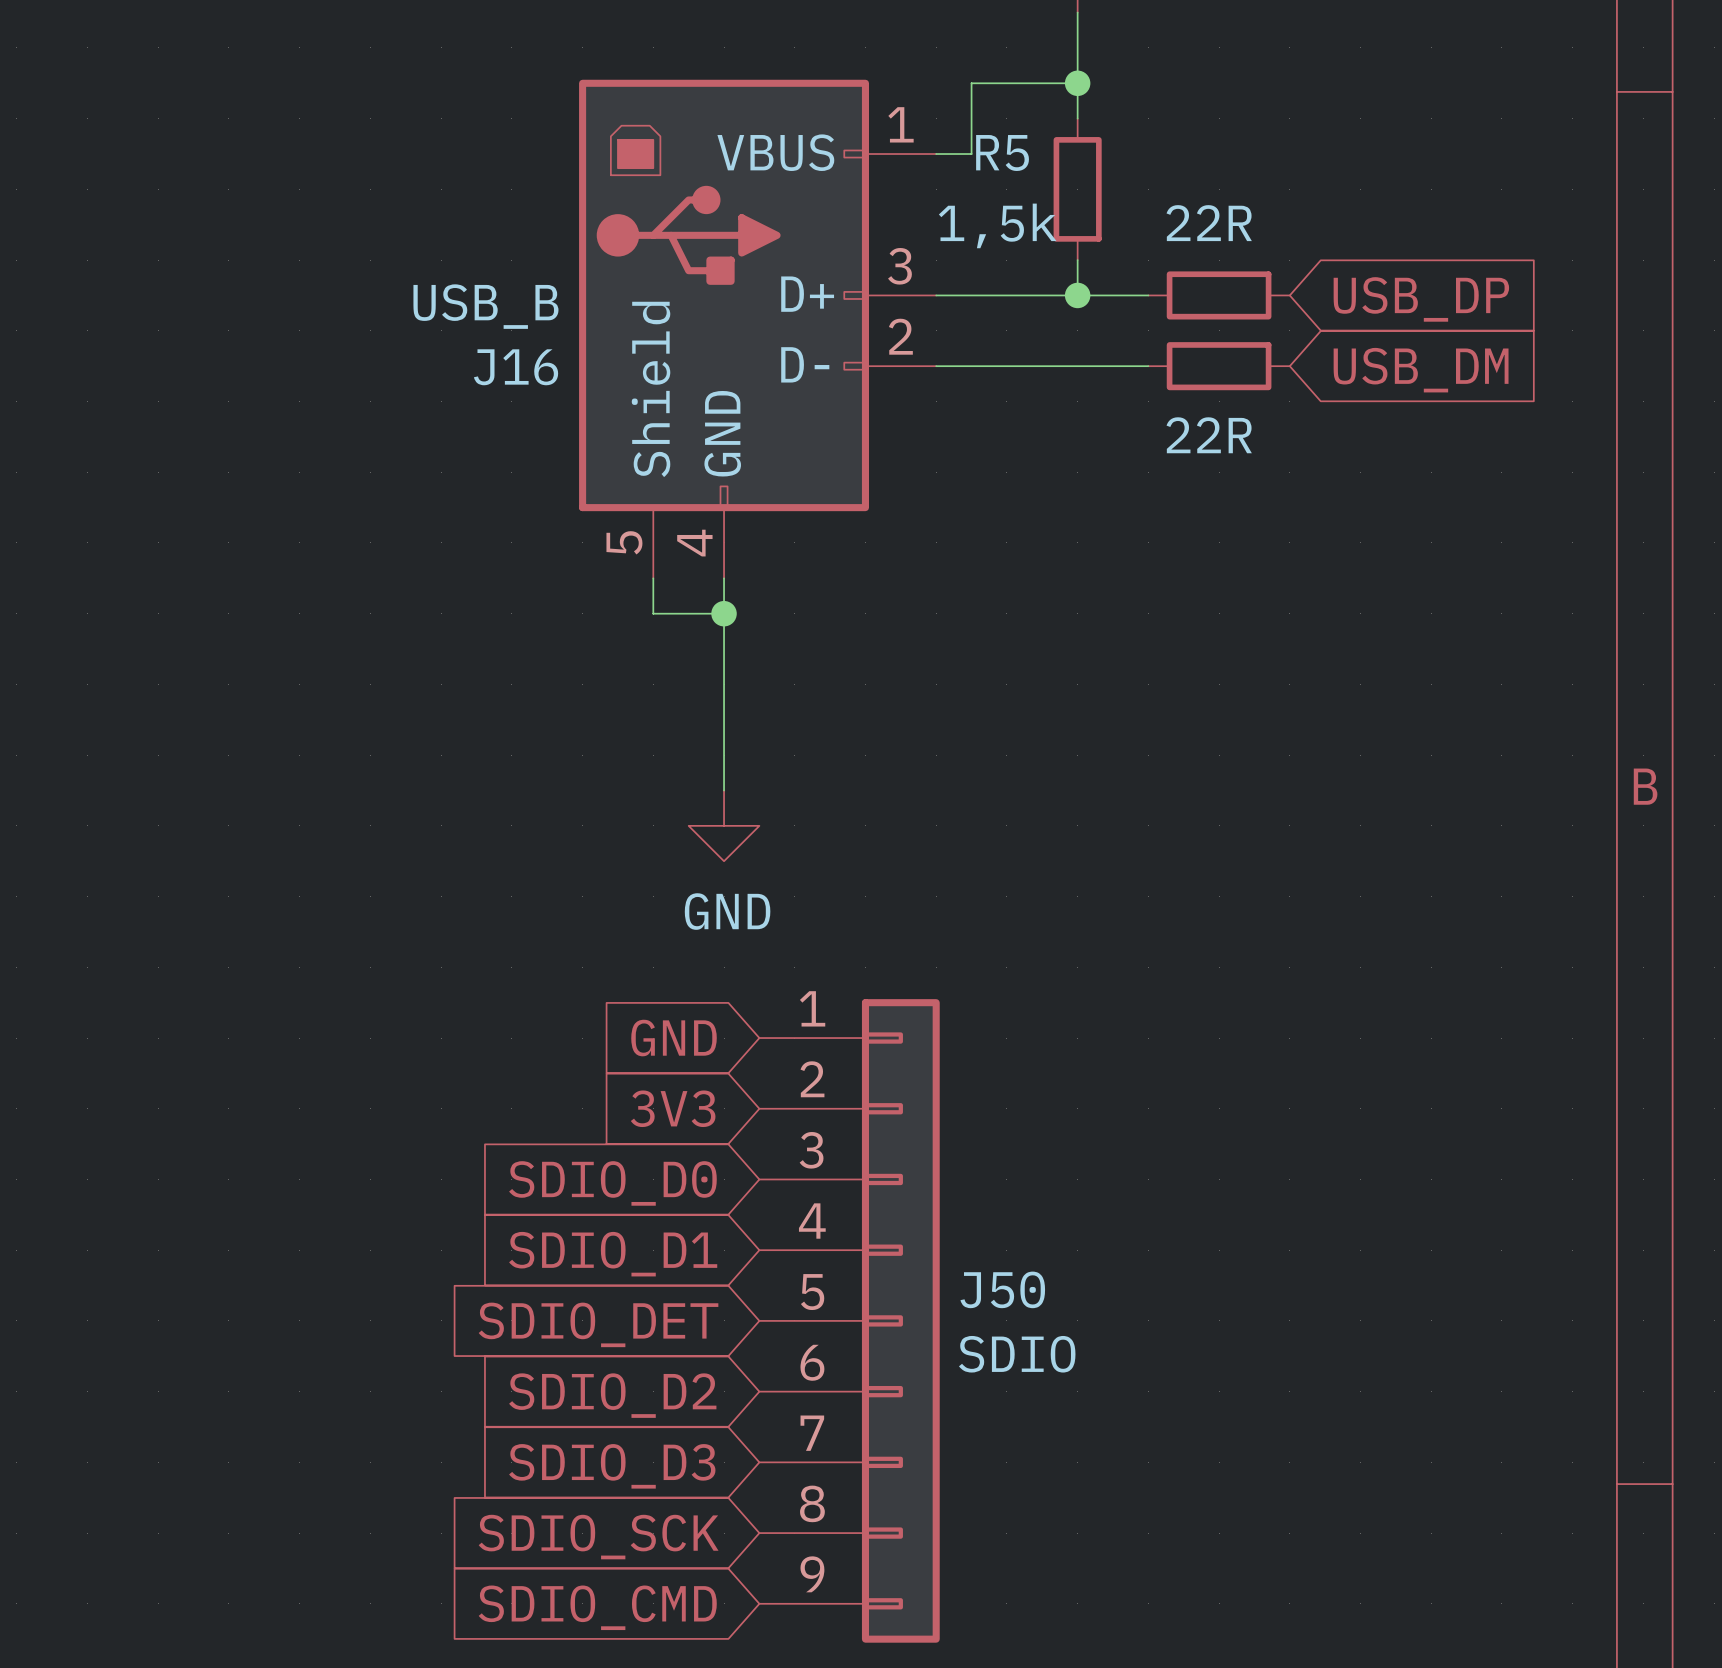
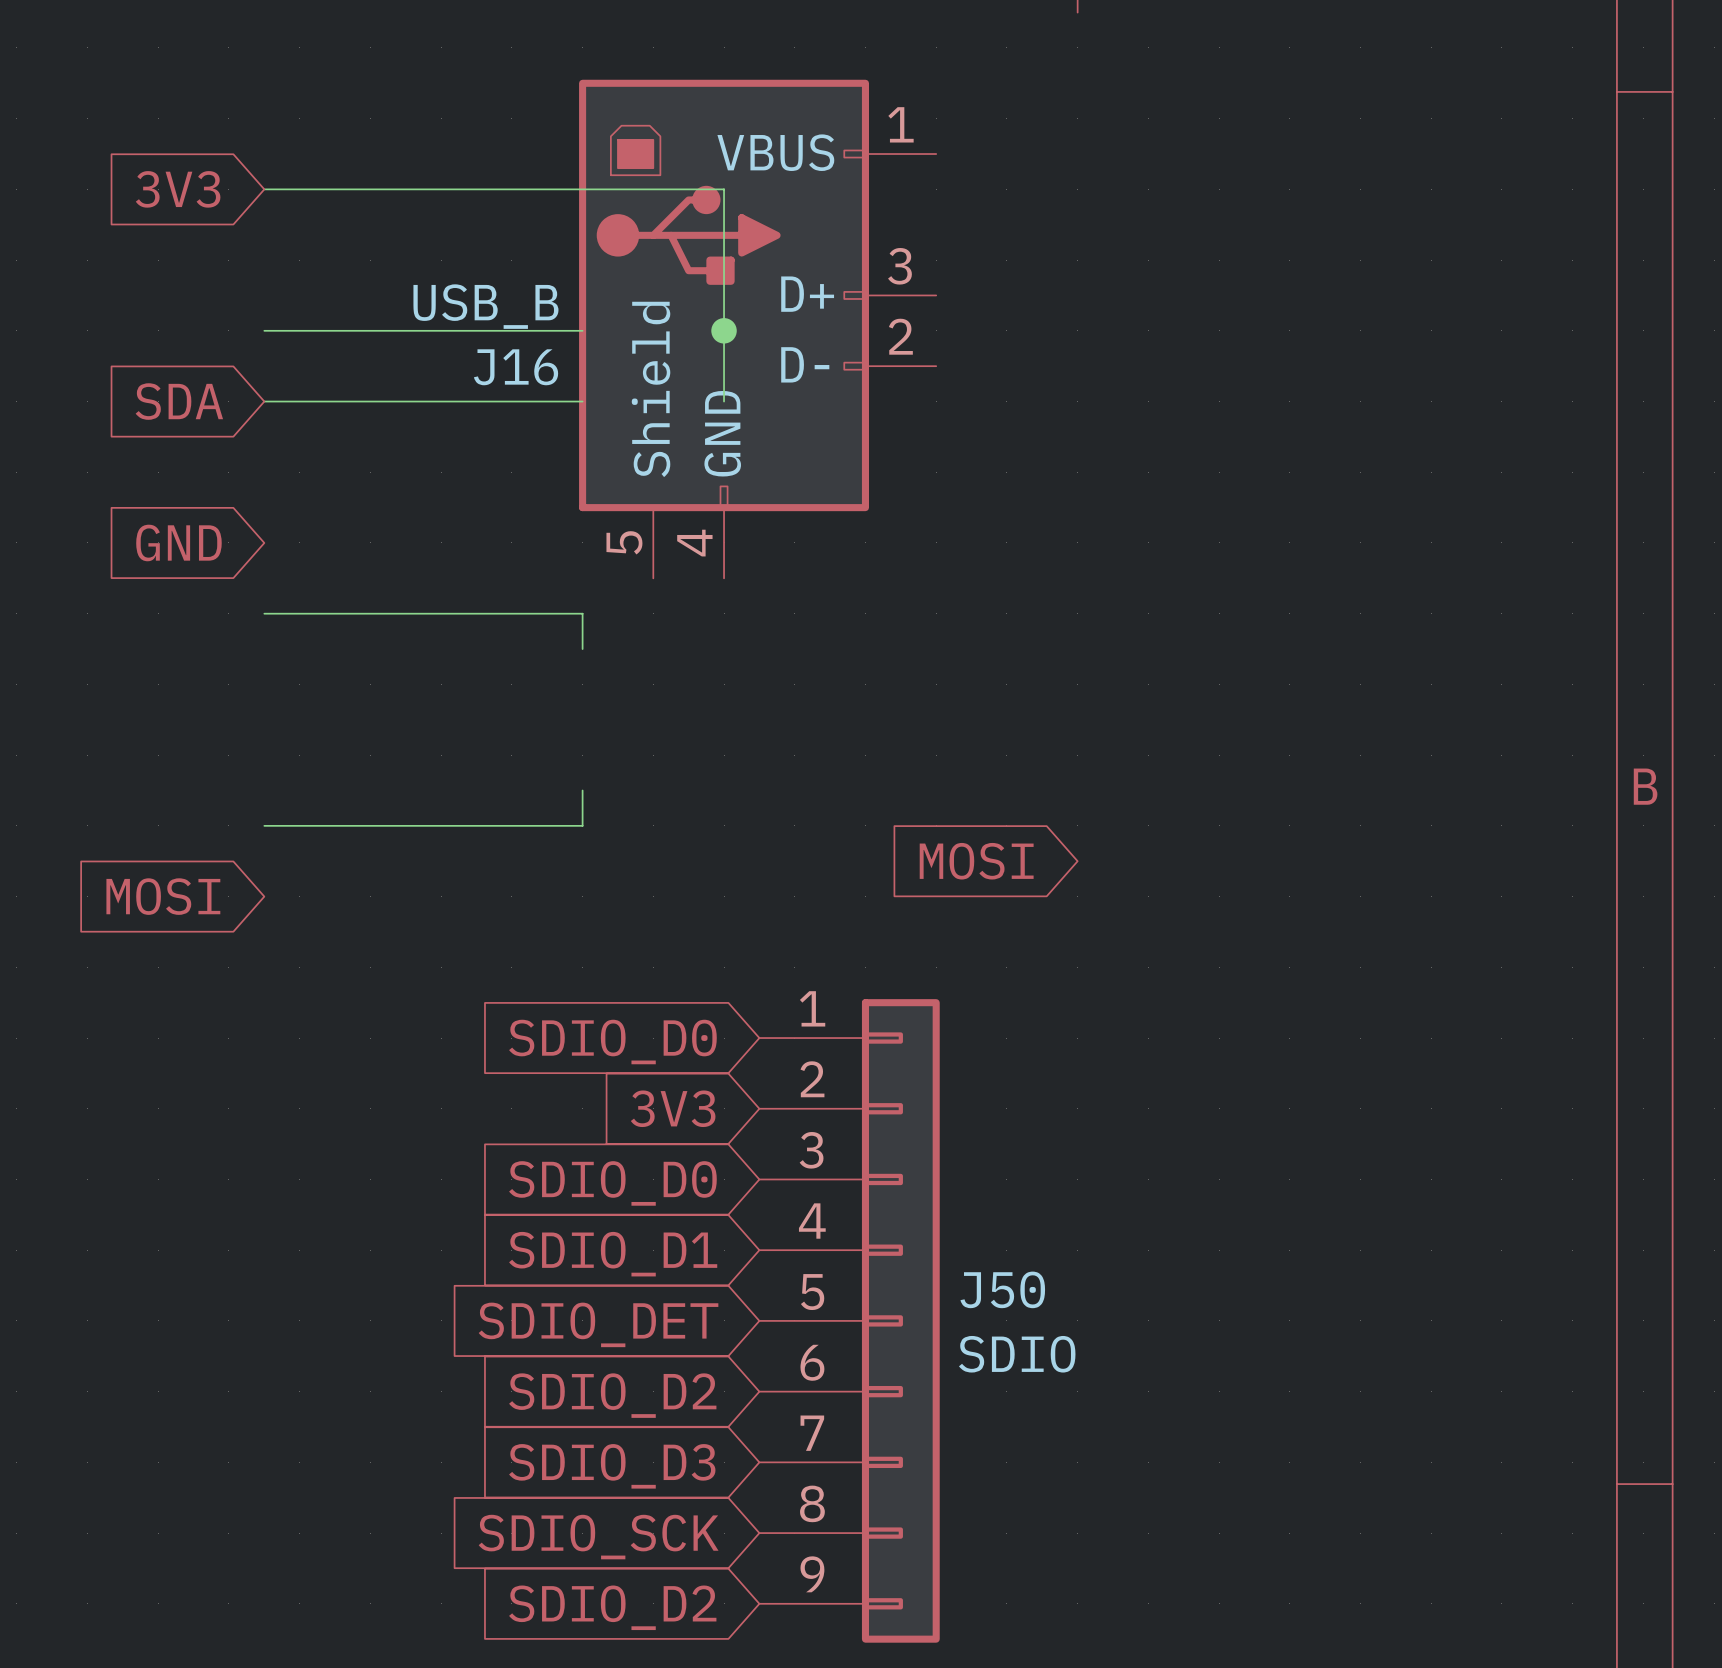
wire: (1077, 12) (1077, 118) -> none
wire: (1077, 83) (971, 83) (971, 154) (936, 154) -> none
junction: (1077, 83) -> none
global label: none -> 3V3 (178, 189)
wire: none -> (264, 189) (724, 189) (724, 401)
R5: 1,5k (1077, 189) -> none
wire: (1077, 260) (1077, 295) -> none
wire: (936, 295) (1148, 295) -> none
junction: (1077, 295) -> none
part: 22R (1219, 295) -> none
global label: USB_DP (1421, 299) -> none
wire: none -> (264, 330) (582, 330)
junction: none -> (724, 330)
wire: (936, 366) (1148, 366) -> none
part: 22R (1219, 366) -> none
global label: USB_DM (1421, 370) -> none
global label: none -> SDA (179, 401)
wire: none -> (264, 401) (582, 401)
global label: none -> GND (178, 542)
wire: (653, 578) (653, 613) (724, 613) -> none
wire: (724, 578) (724, 790) -> none
wire: none -> (264, 613) (582, 613) (582, 649)
junction: (724, 613) -> none
wire: none -> (582, 790) (582, 825) (264, 825)
power symbol: GND (724, 825) -> none
global label: none -> MOSI (976, 861)
global label: none -> MOSI (163, 896)
global label: GND (674, 1038) -> SDIO_D0 (612, 1042)
global label: SDIO_CMD (597, 1607) -> SDIO_D2 (612, 1607)

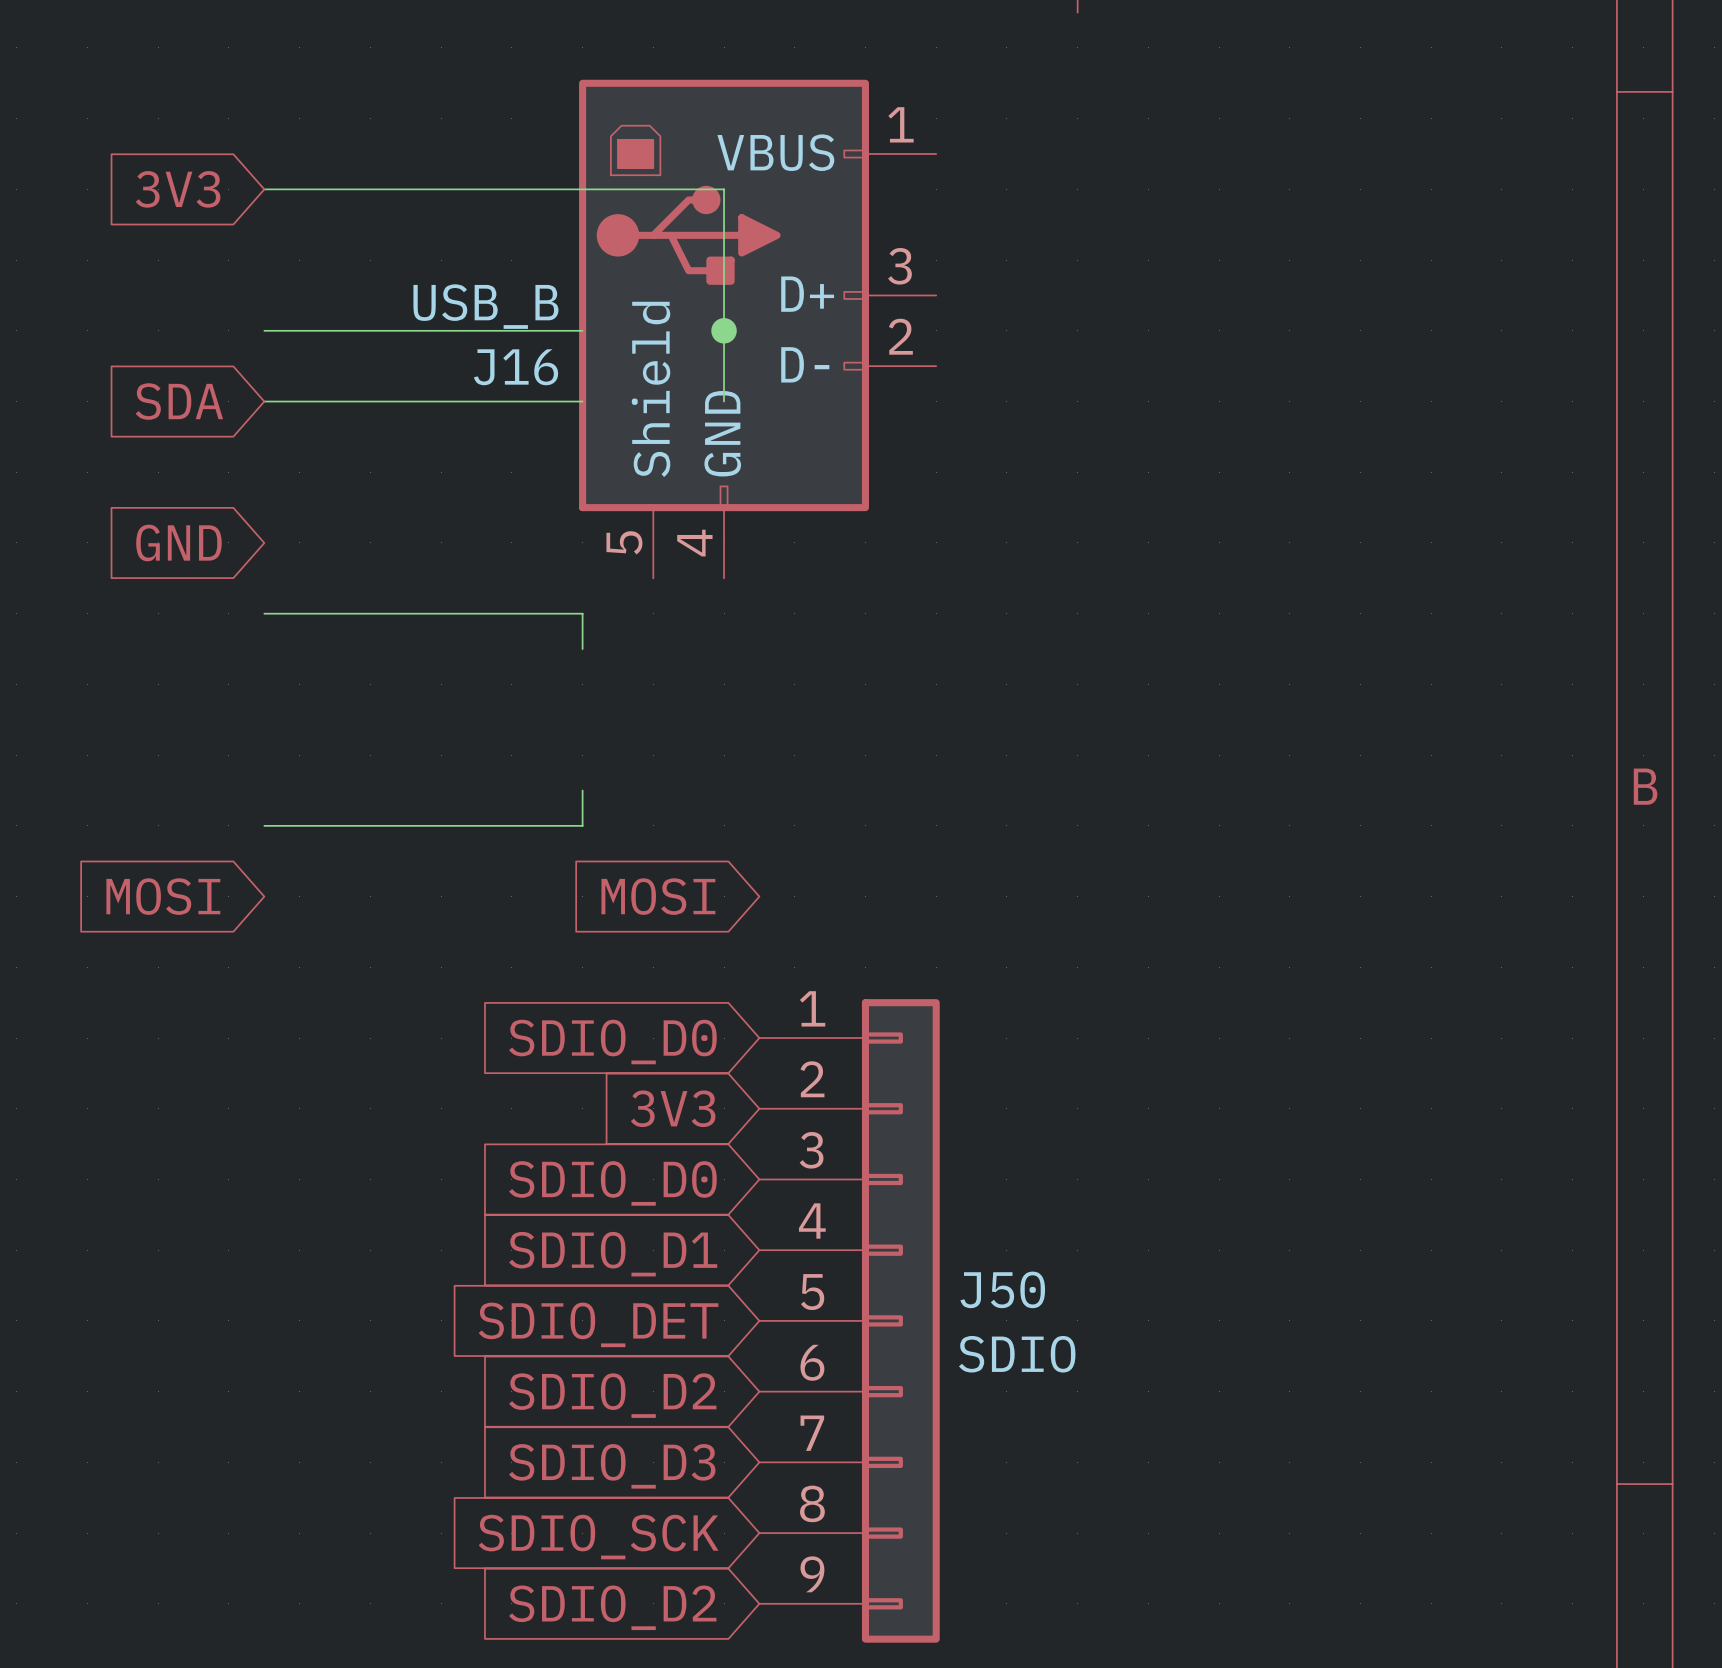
global label position: MOSI (976, 861) -> MOSI (658, 896)

